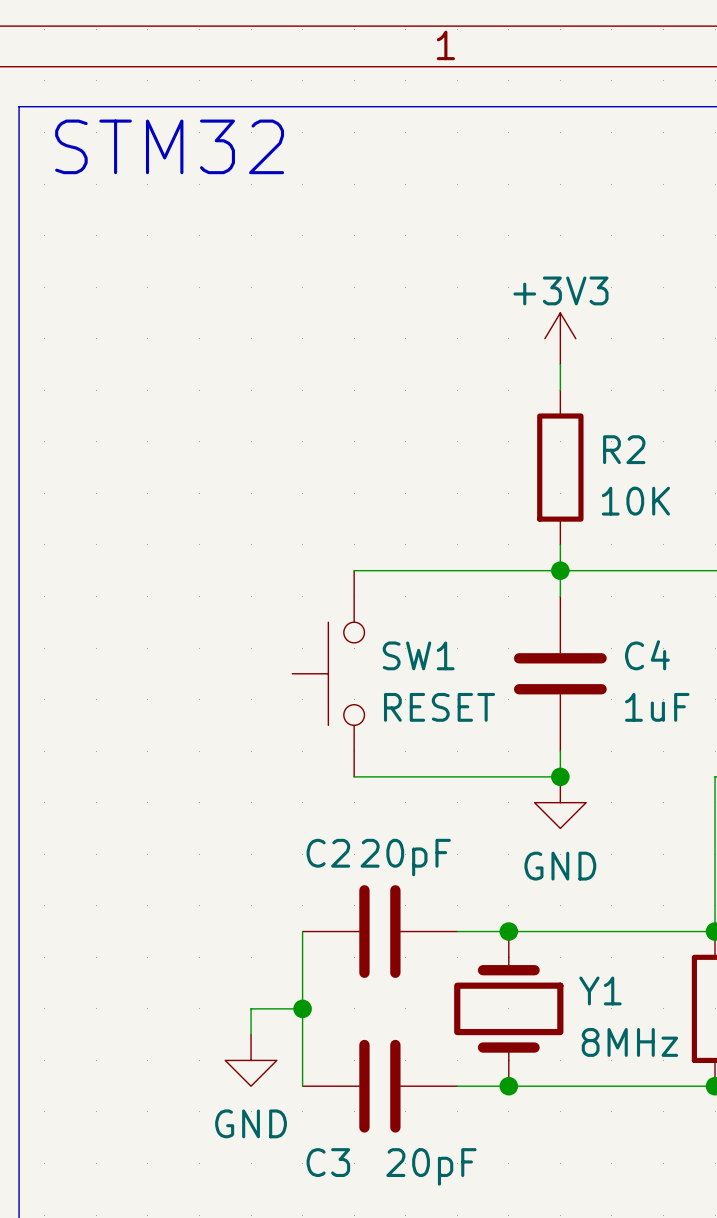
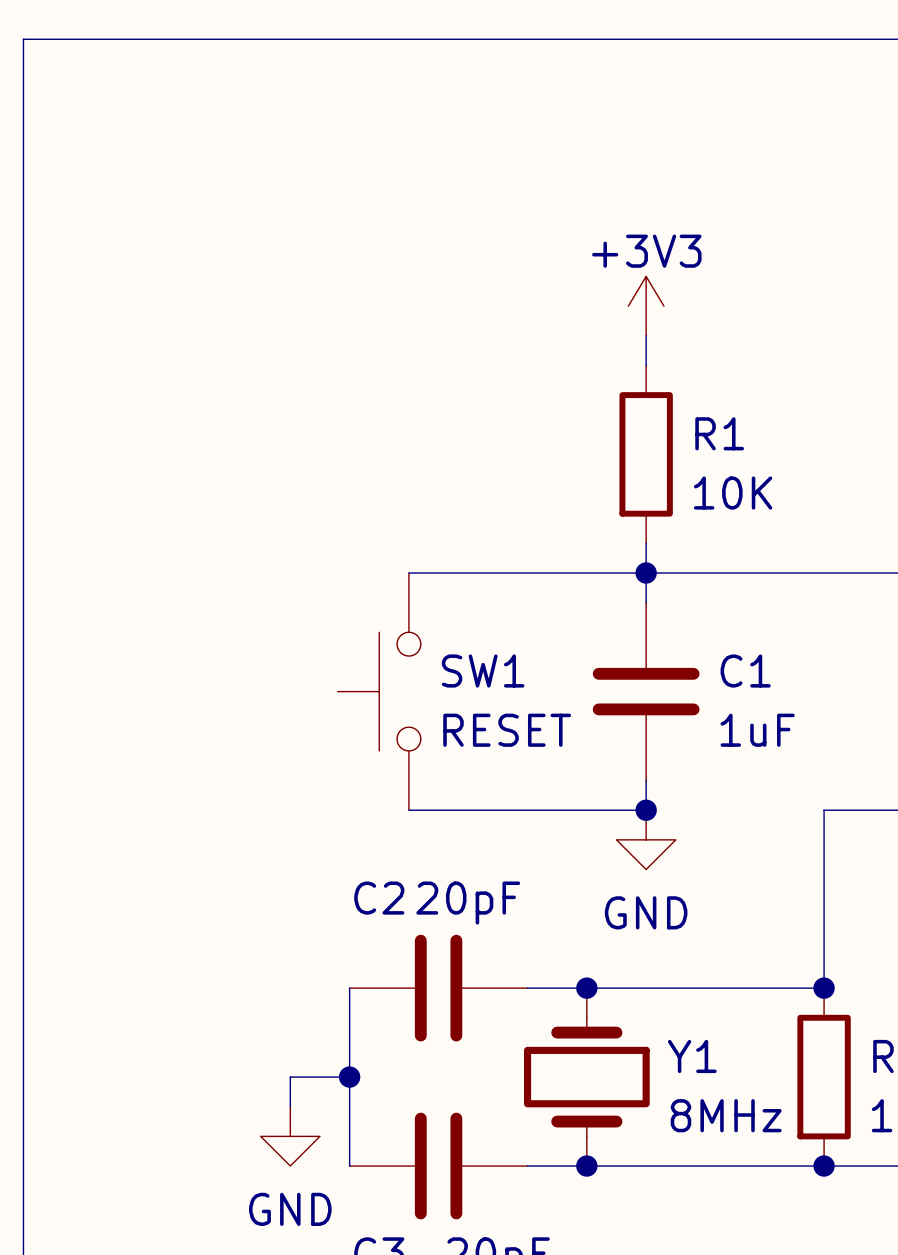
text: STM32 (169, 146) -> none
R2 name: R2 (624, 449) -> R1 (719, 433)
C4 name: C4 (647, 655) -> C1 (745, 671)

